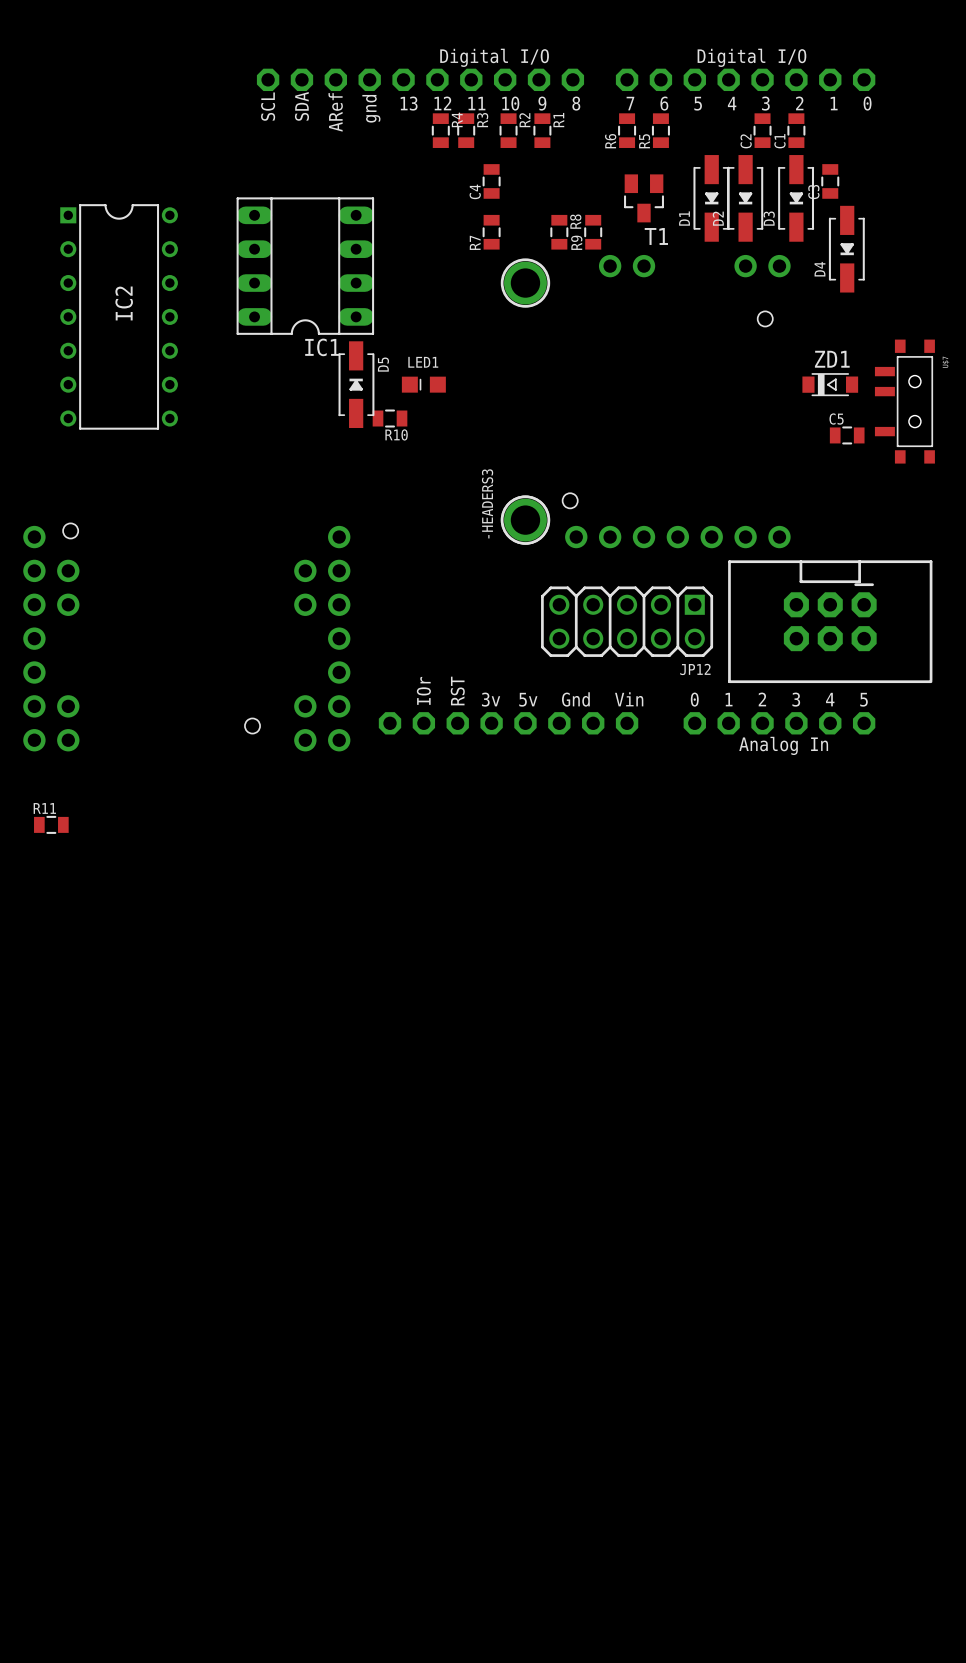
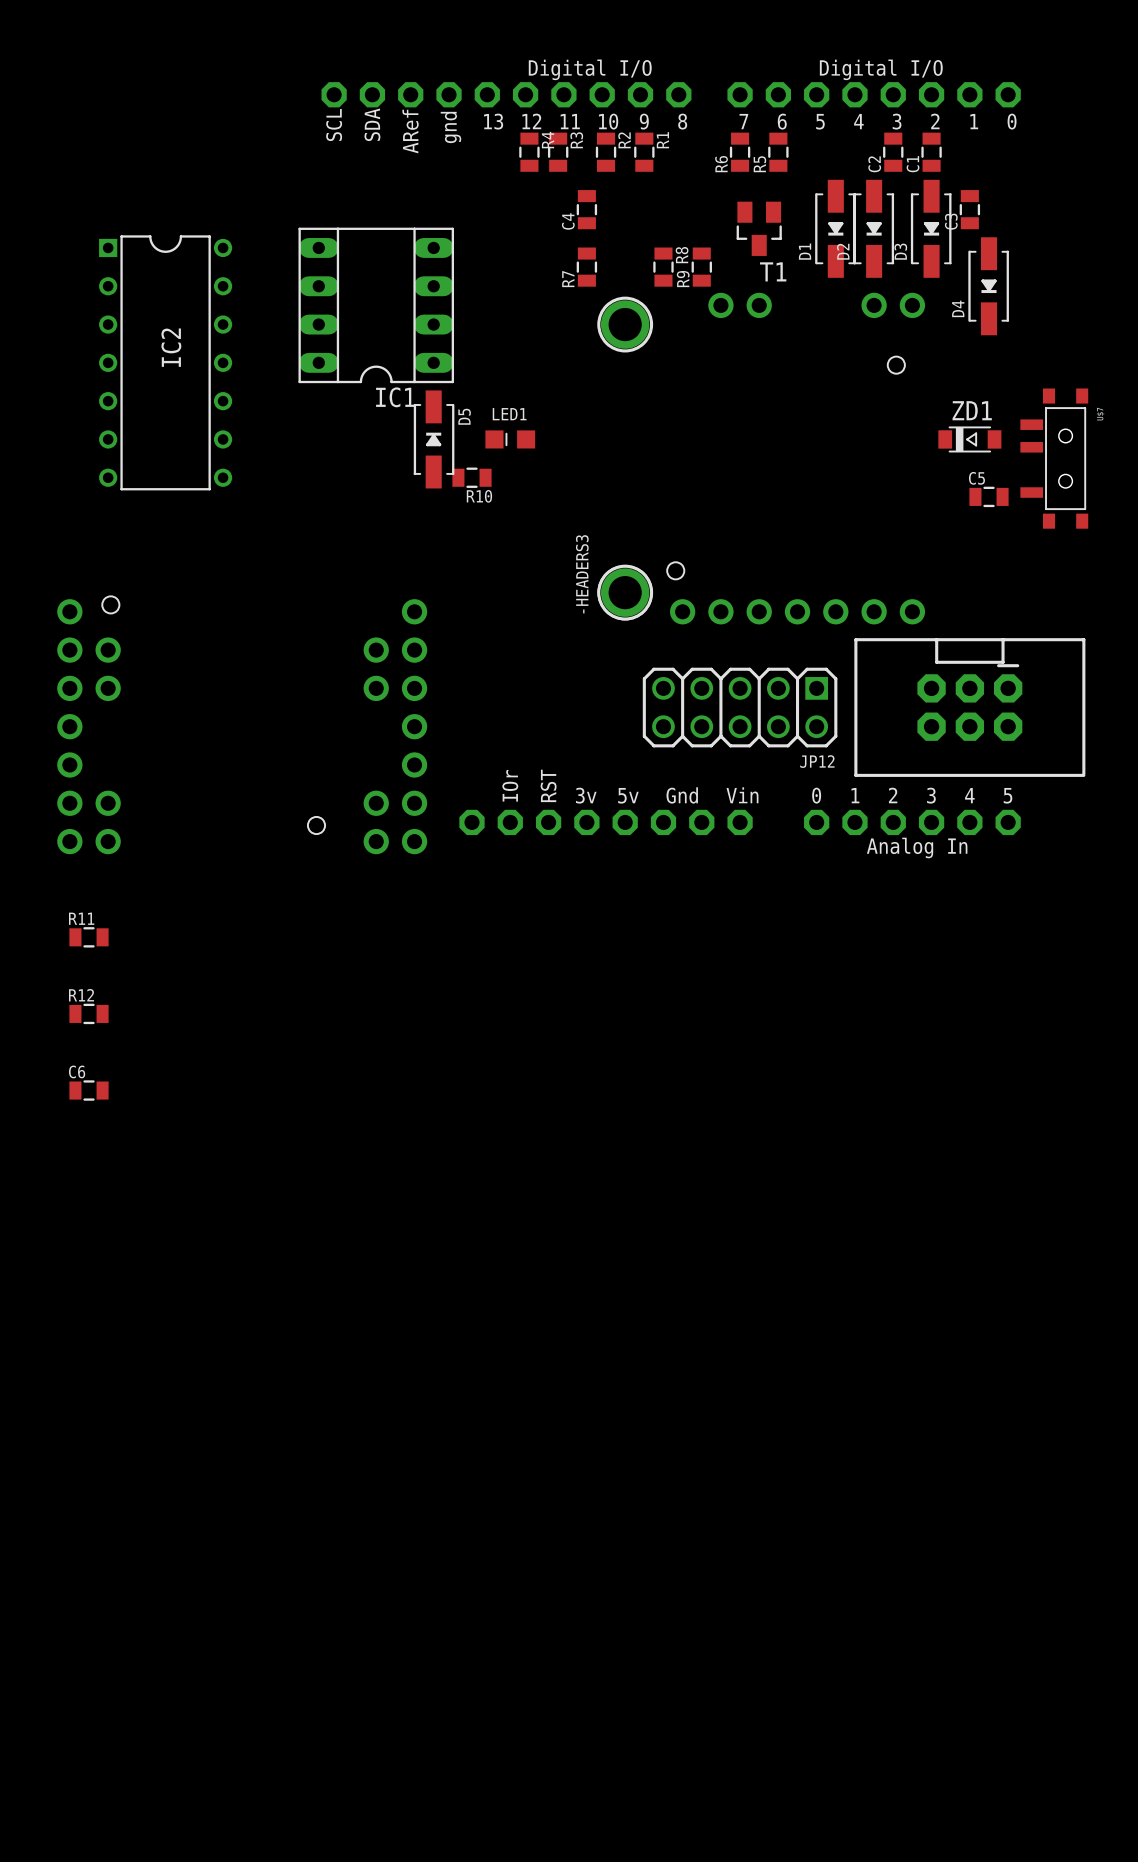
R12: none -> (89, 1013)
C6: none -> (89, 1090)

